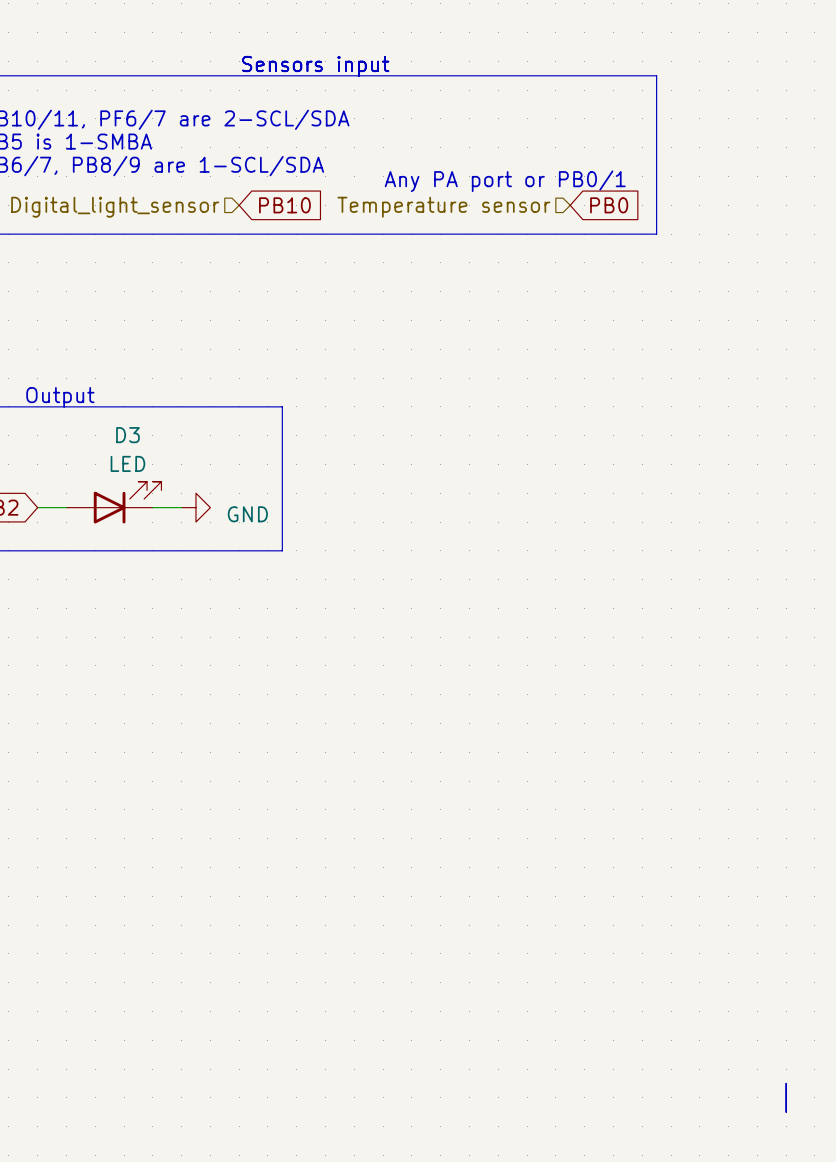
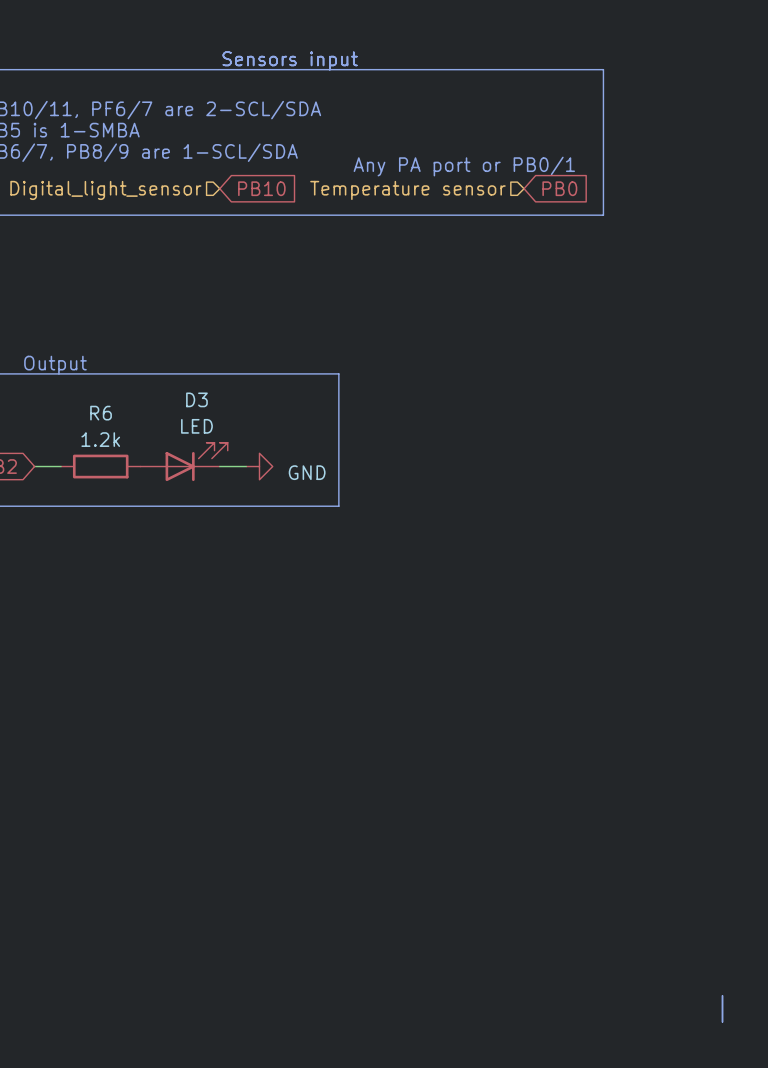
line: (282, 406) (282, 550) -> (259, 373) (338, 373) (338, 506) (259, 506)
D3 position: (113, 502) -> (184, 461)
R6: none -> 1.2k (100, 466)
power symbol position: GND (195, 507) -> GND (259, 466)

